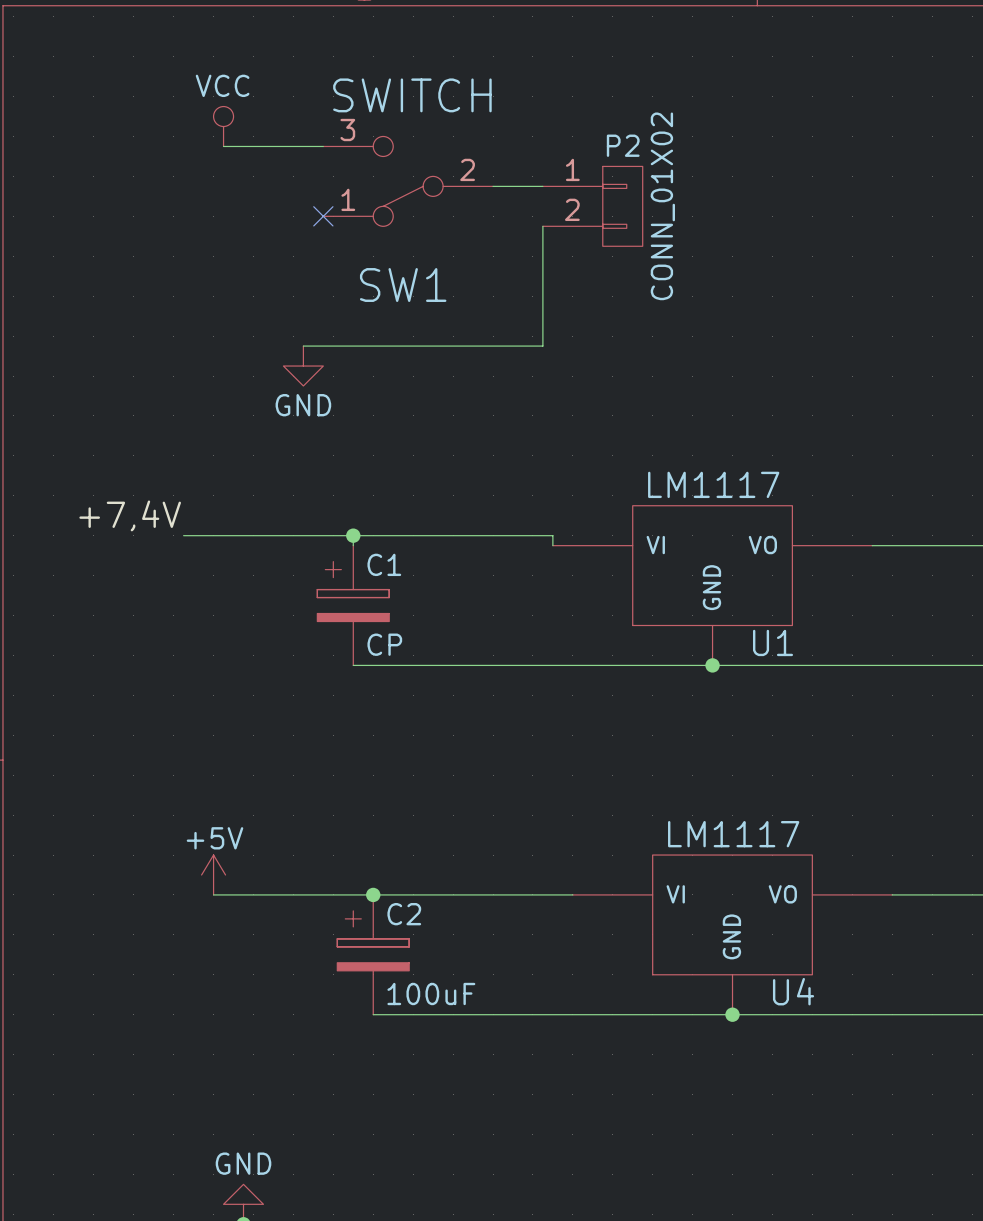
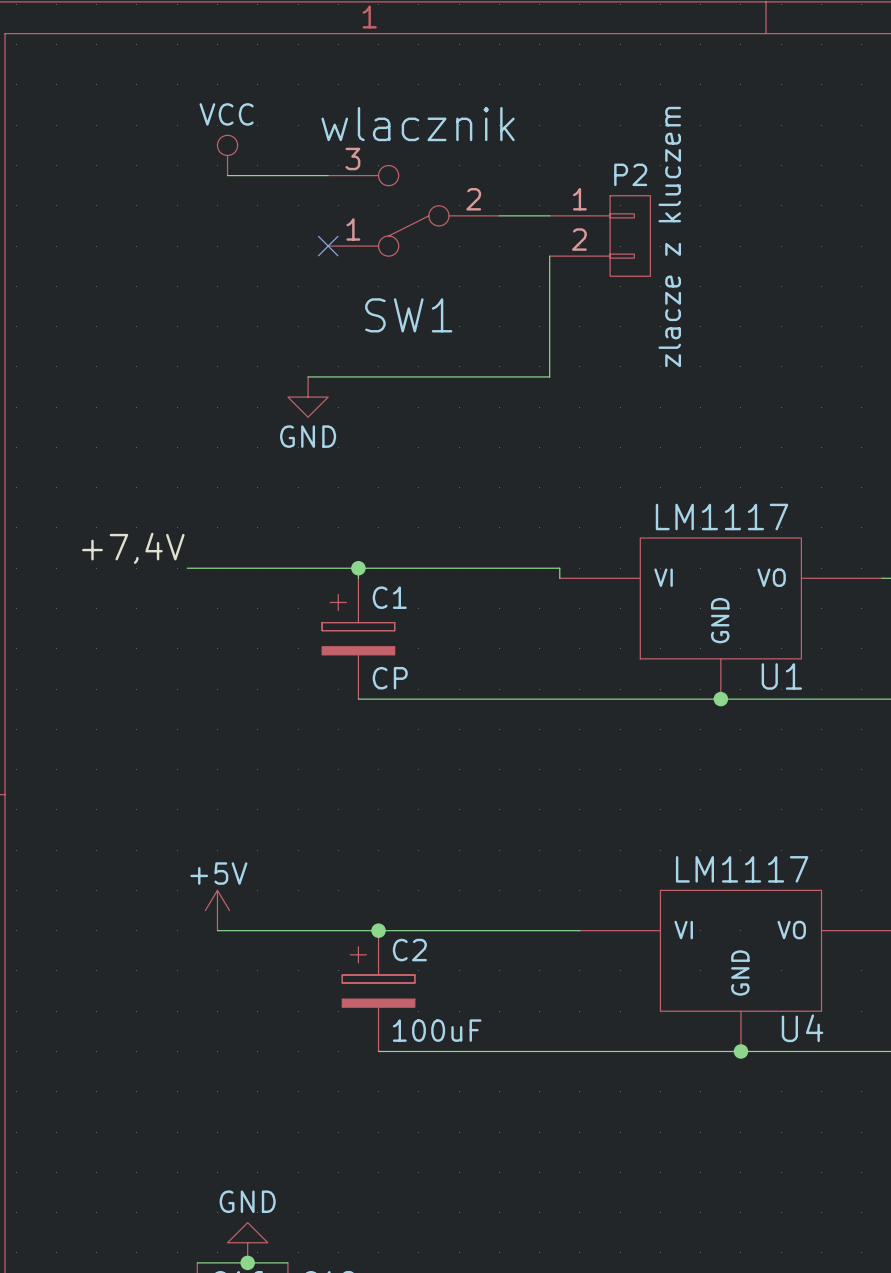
SW1 value: SWITCH (412, 95) -> wlacznik (418, 124)
P2 value: CONN_01X02 (662, 206) -> zlacze z kluczem (669, 236)

